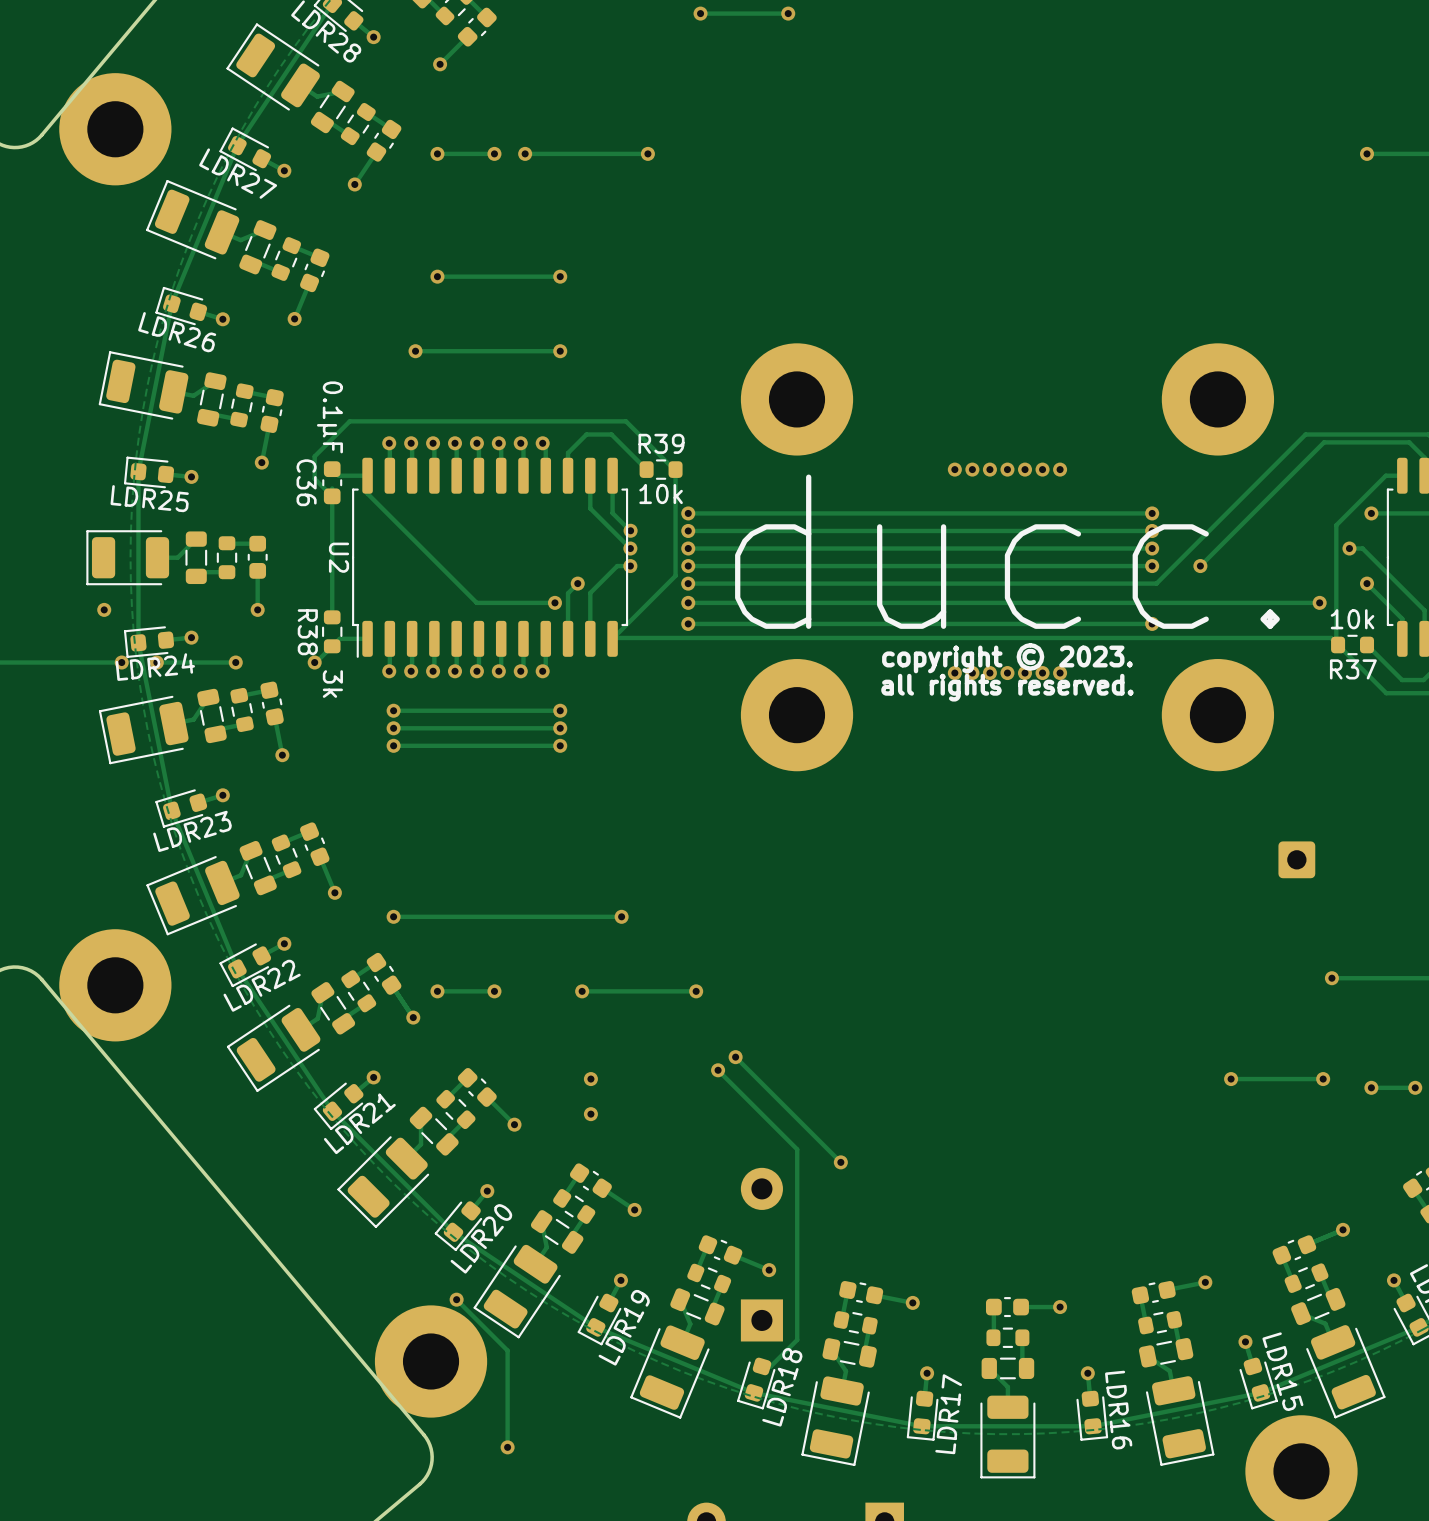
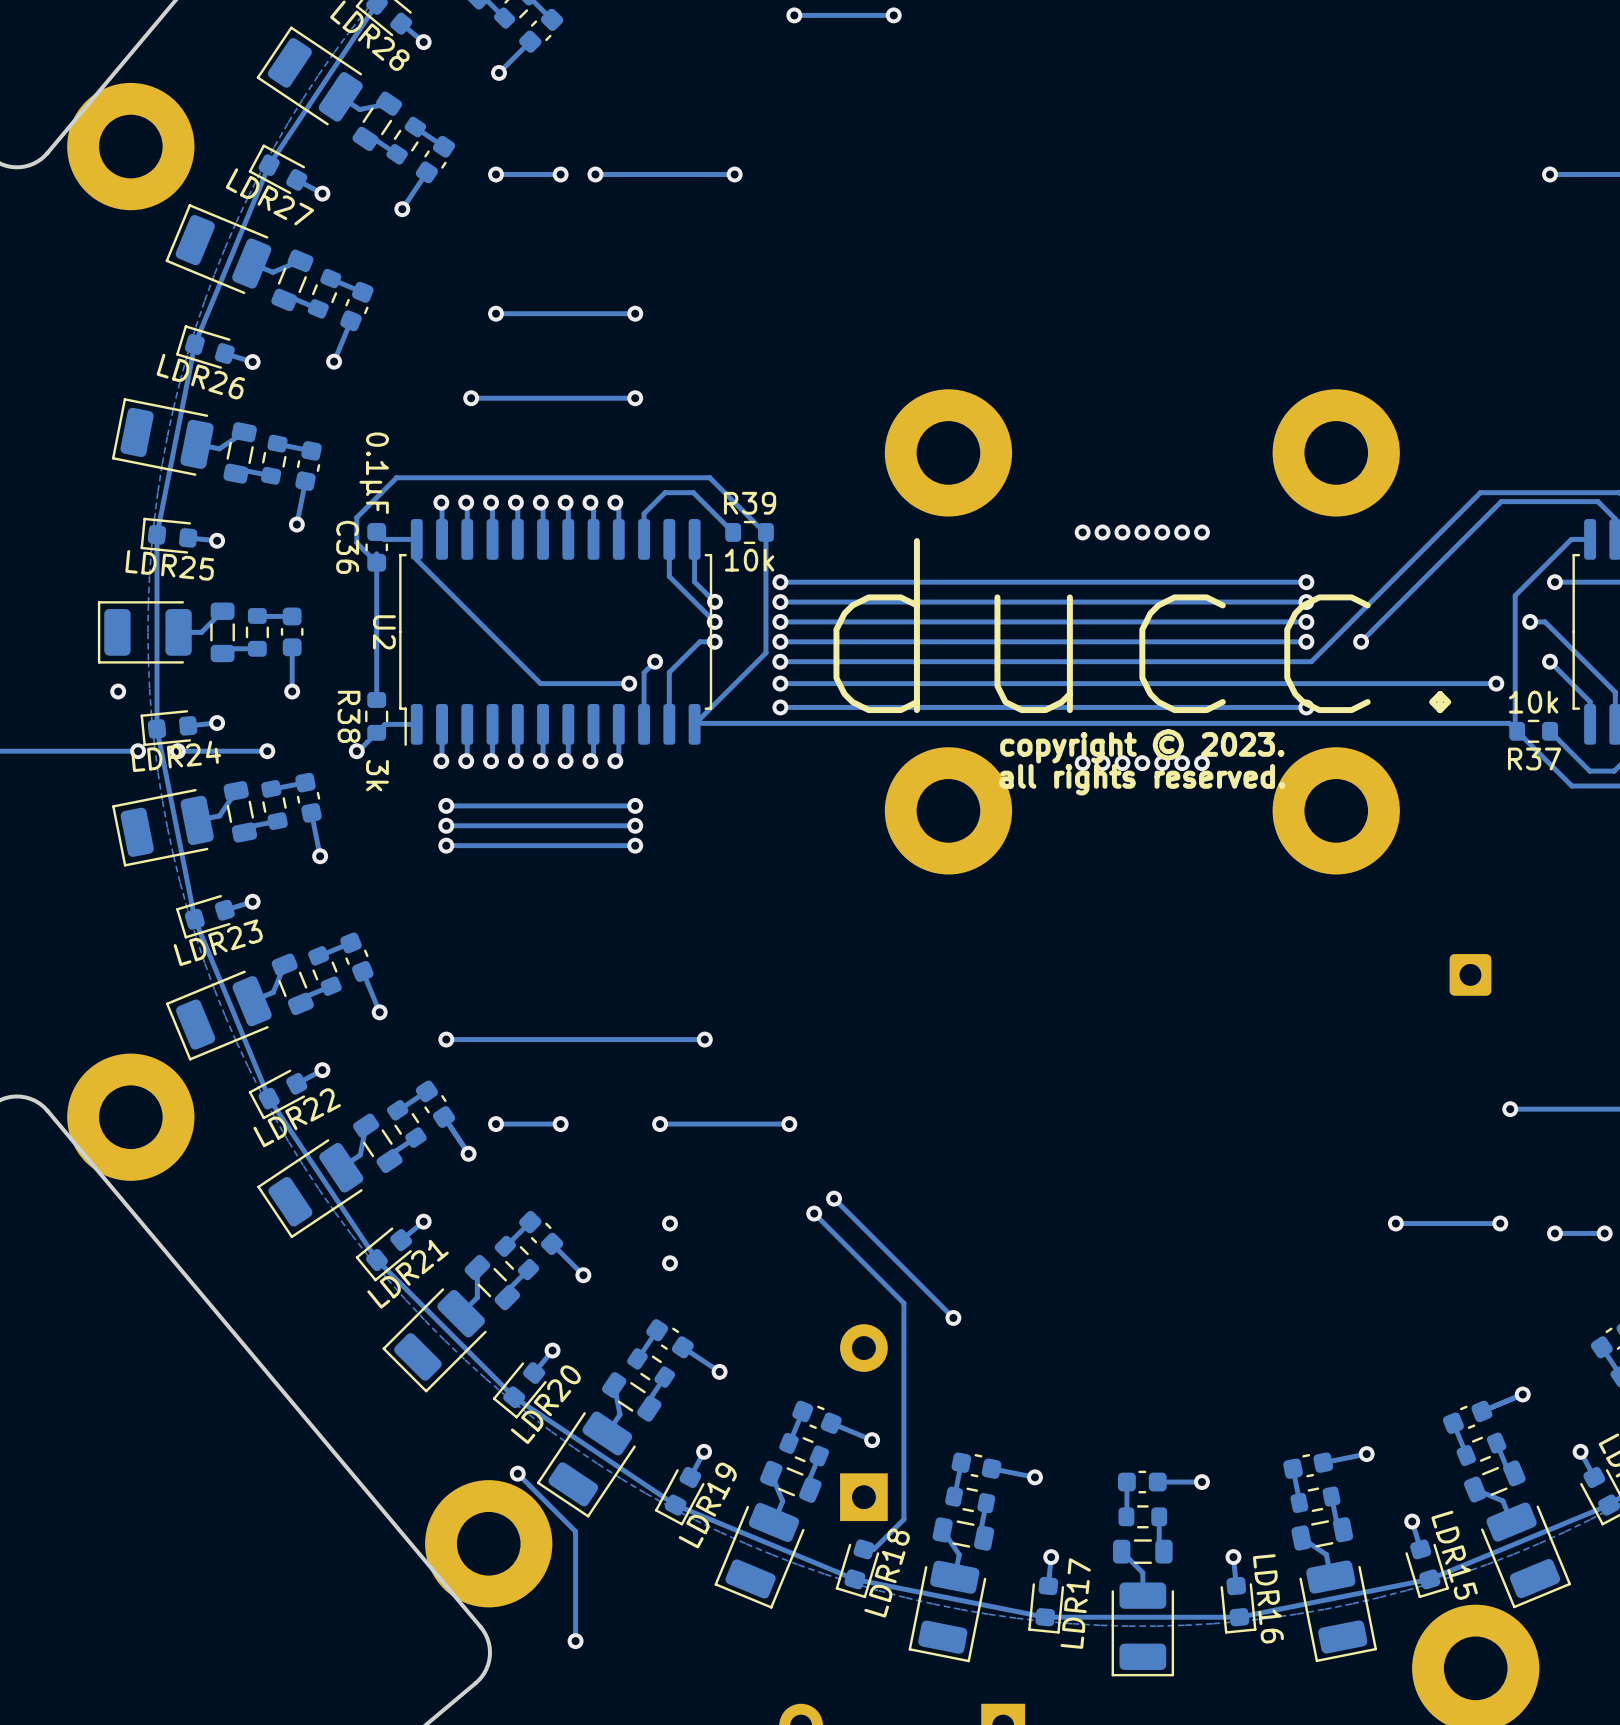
part position: (797, 399) -> (948, 452)
part position: (1217, 399) -> (1336, 452)
part position: (797, 715) -> (948, 810)
part position: (1217, 715) -> (1336, 810)

